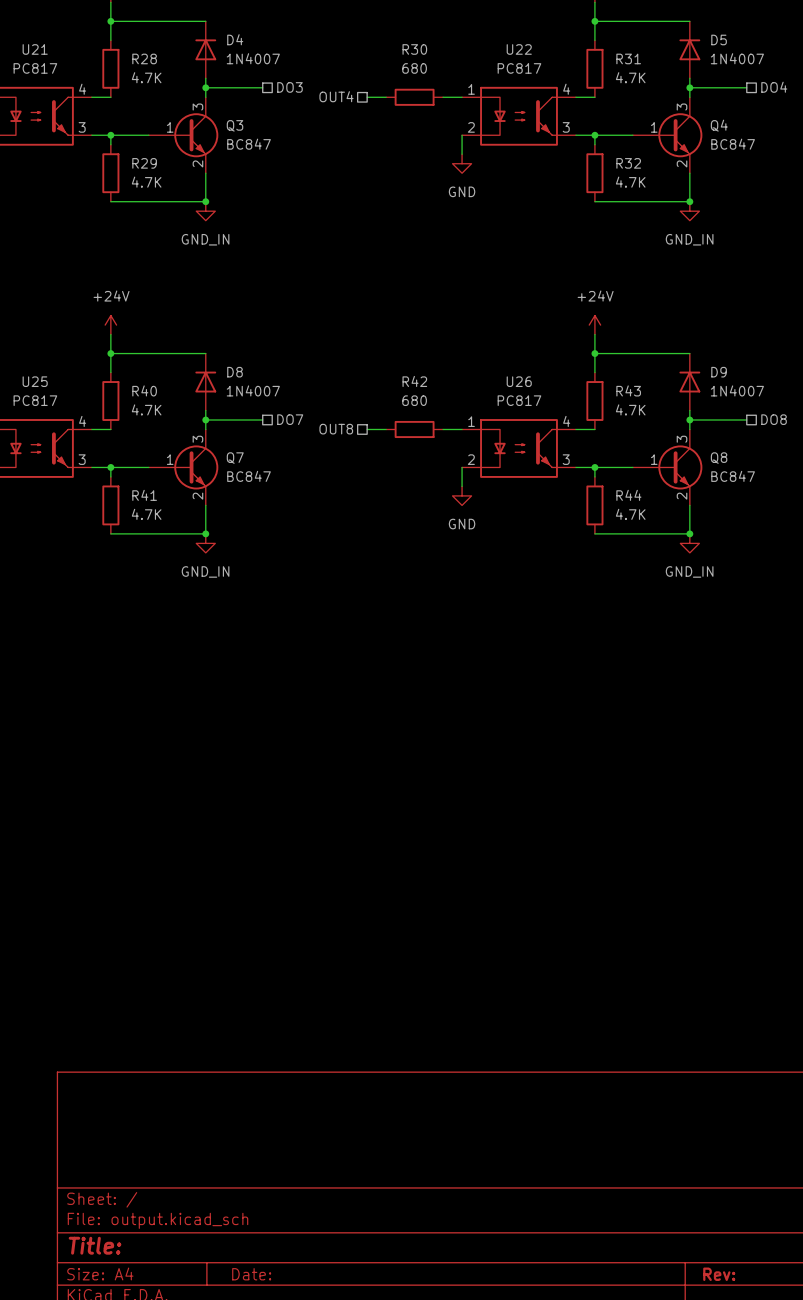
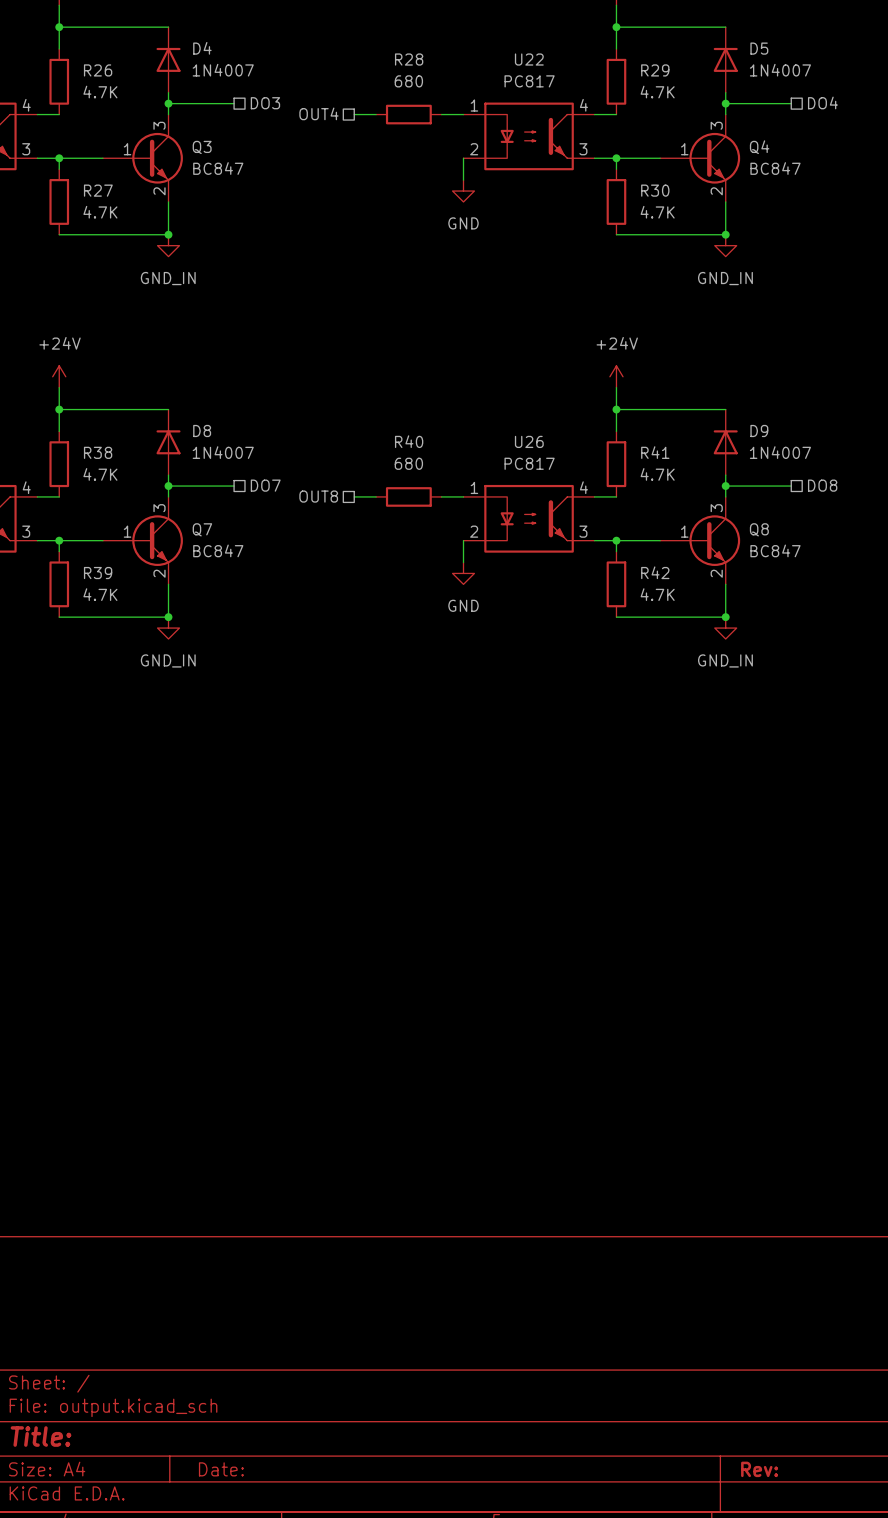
R30 name: R30 (414, 49) -> R28 (409, 59)
R28 name: R28 (144, 58) -> R26 (98, 70)
R31 name: R31 (628, 58) -> R29 (655, 70)
R29 name: R29 (144, 163) -> R27 (98, 190)
R32 name: R32 (628, 163) -> R30 (655, 190)
R42 name: R42 (414, 381) -> R40 (409, 441)
R40 name: R40 (144, 390) -> R38 (98, 452)
R43 name: R43 (628, 390) -> R41 (655, 452)
R41 name: R41 (144, 495) -> R39 (98, 573)
R44 name: R44 (628, 495) -> R42 (655, 572)

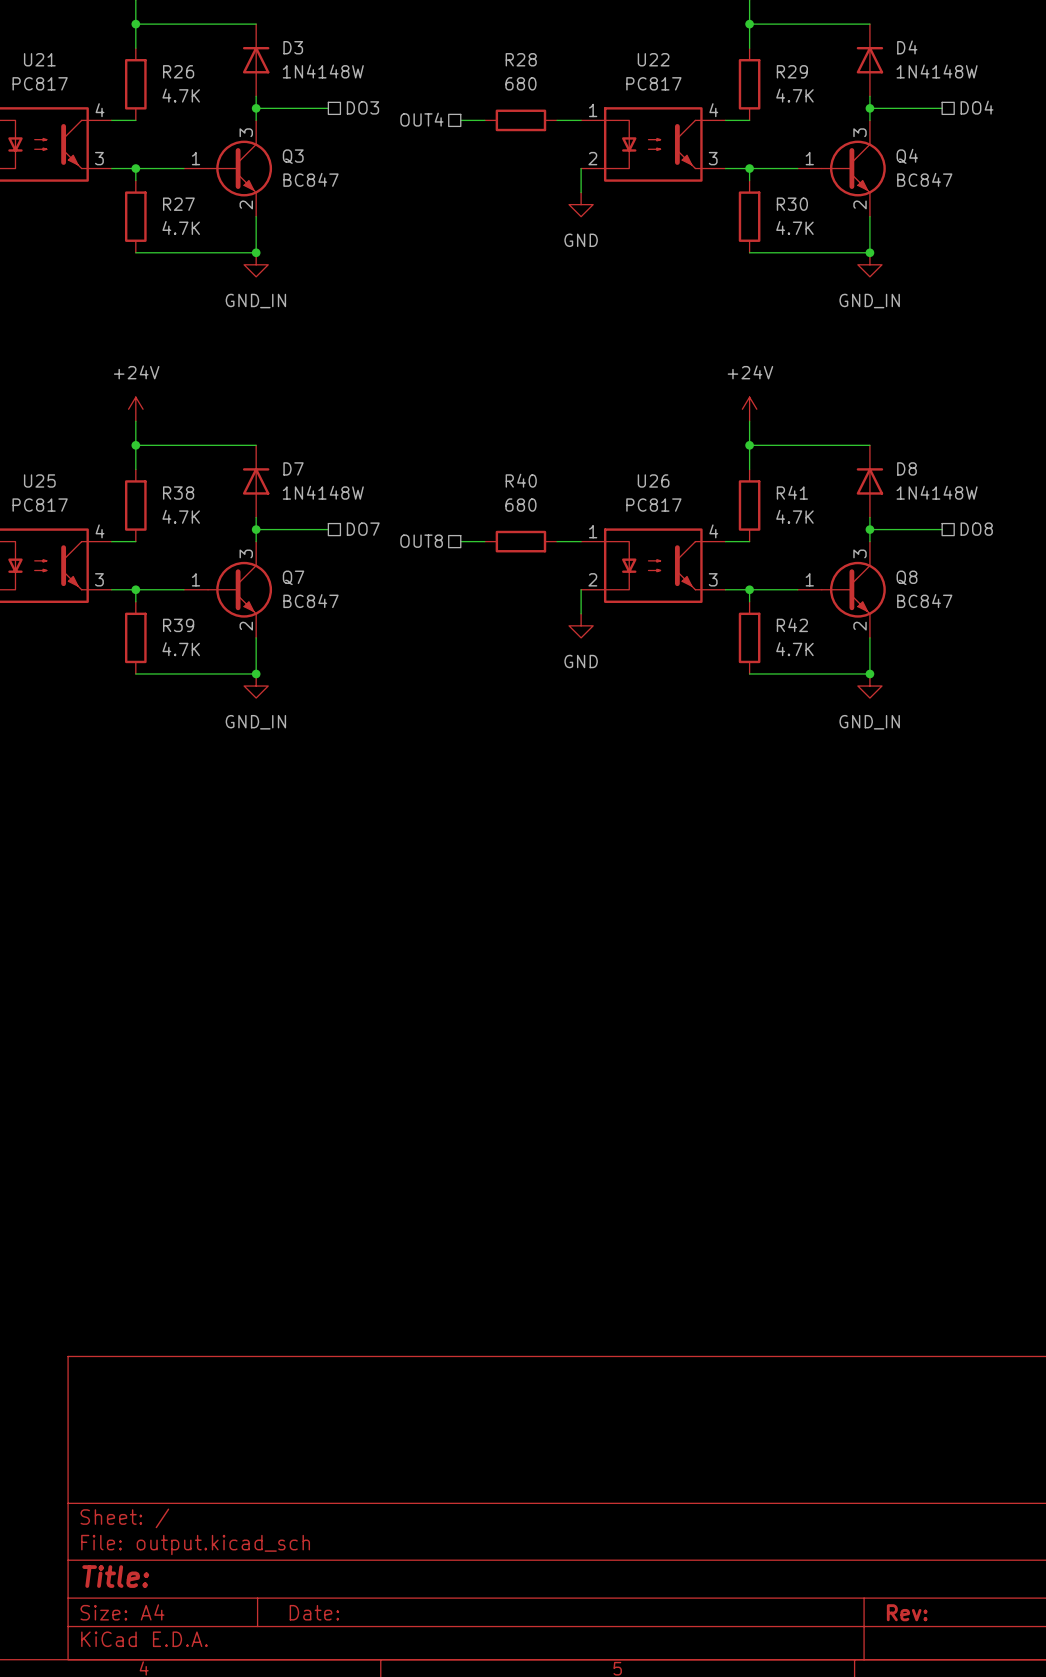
D4 name: D4 (202, 48) -> D3 (293, 47)
D5 name: D5 (759, 48) -> D4 (907, 47)
D4 value: 1N4007 (223, 70) -> 1N4148W (323, 71)
D5 value: 1N4007 (780, 70) -> 1N4148W (937, 71)
Q3 symbol: [102, 114, 183, 202] -> [183, 120, 273, 217]
Q4 symbol: [660, 114, 741, 202] -> [797, 120, 886, 217]
D8 name: D8 (202, 430) -> D7 (293, 468)
D9 name: D9 (759, 430) -> D8 (906, 468)
D8 value: 1N4007 (223, 452) -> 1N4148W (323, 492)
D9 value: 1N4007 (780, 452) -> 1N4148W (937, 492)
Q7 symbol: [102, 496, 183, 585] -> [183, 541, 273, 638]
Q8 symbol: [660, 496, 741, 585] -> [797, 541, 886, 638]

